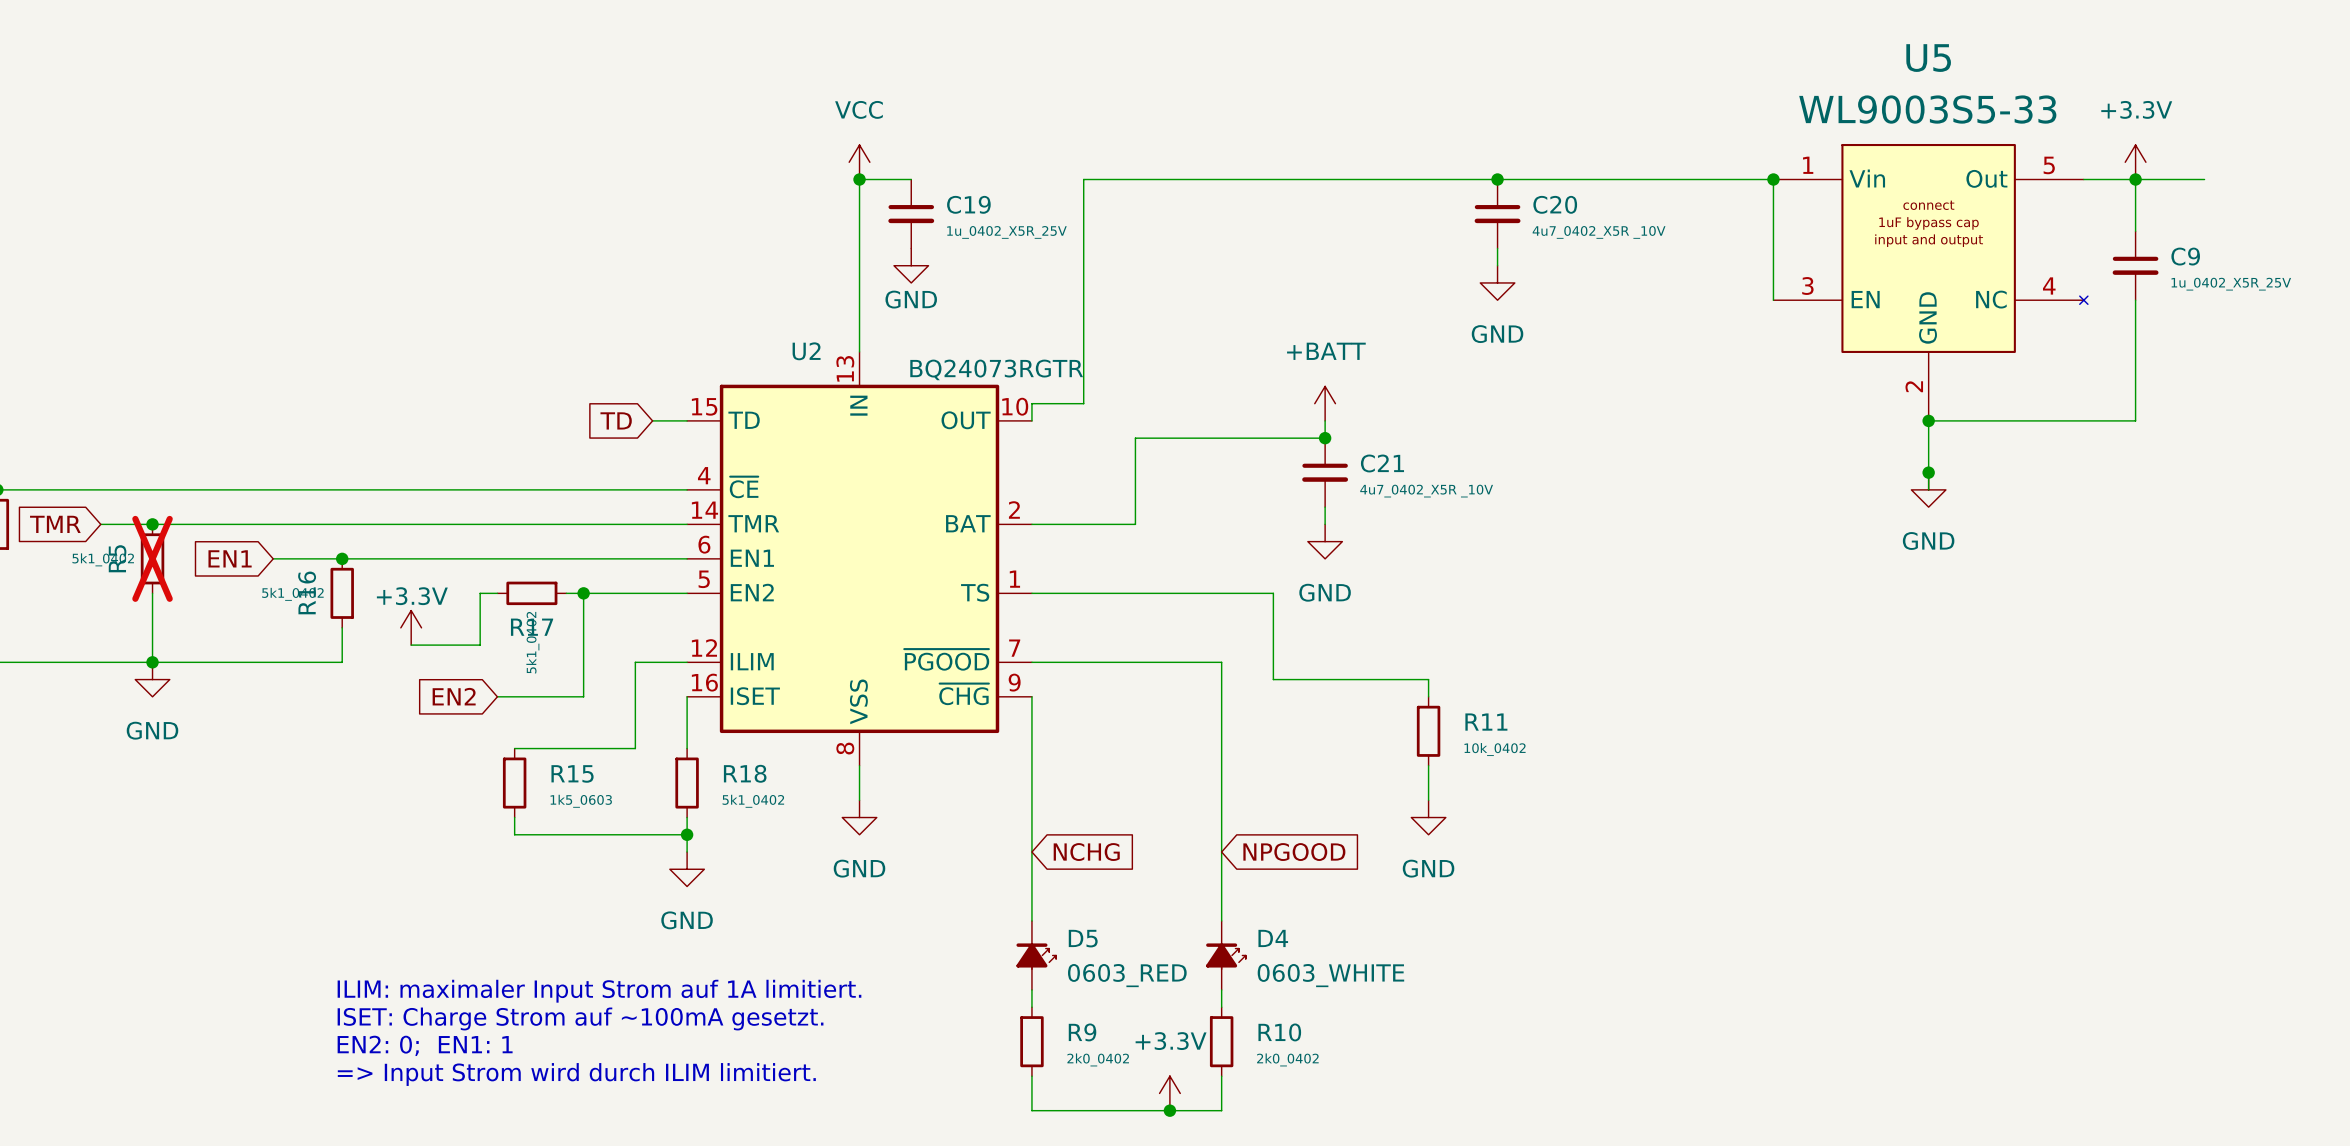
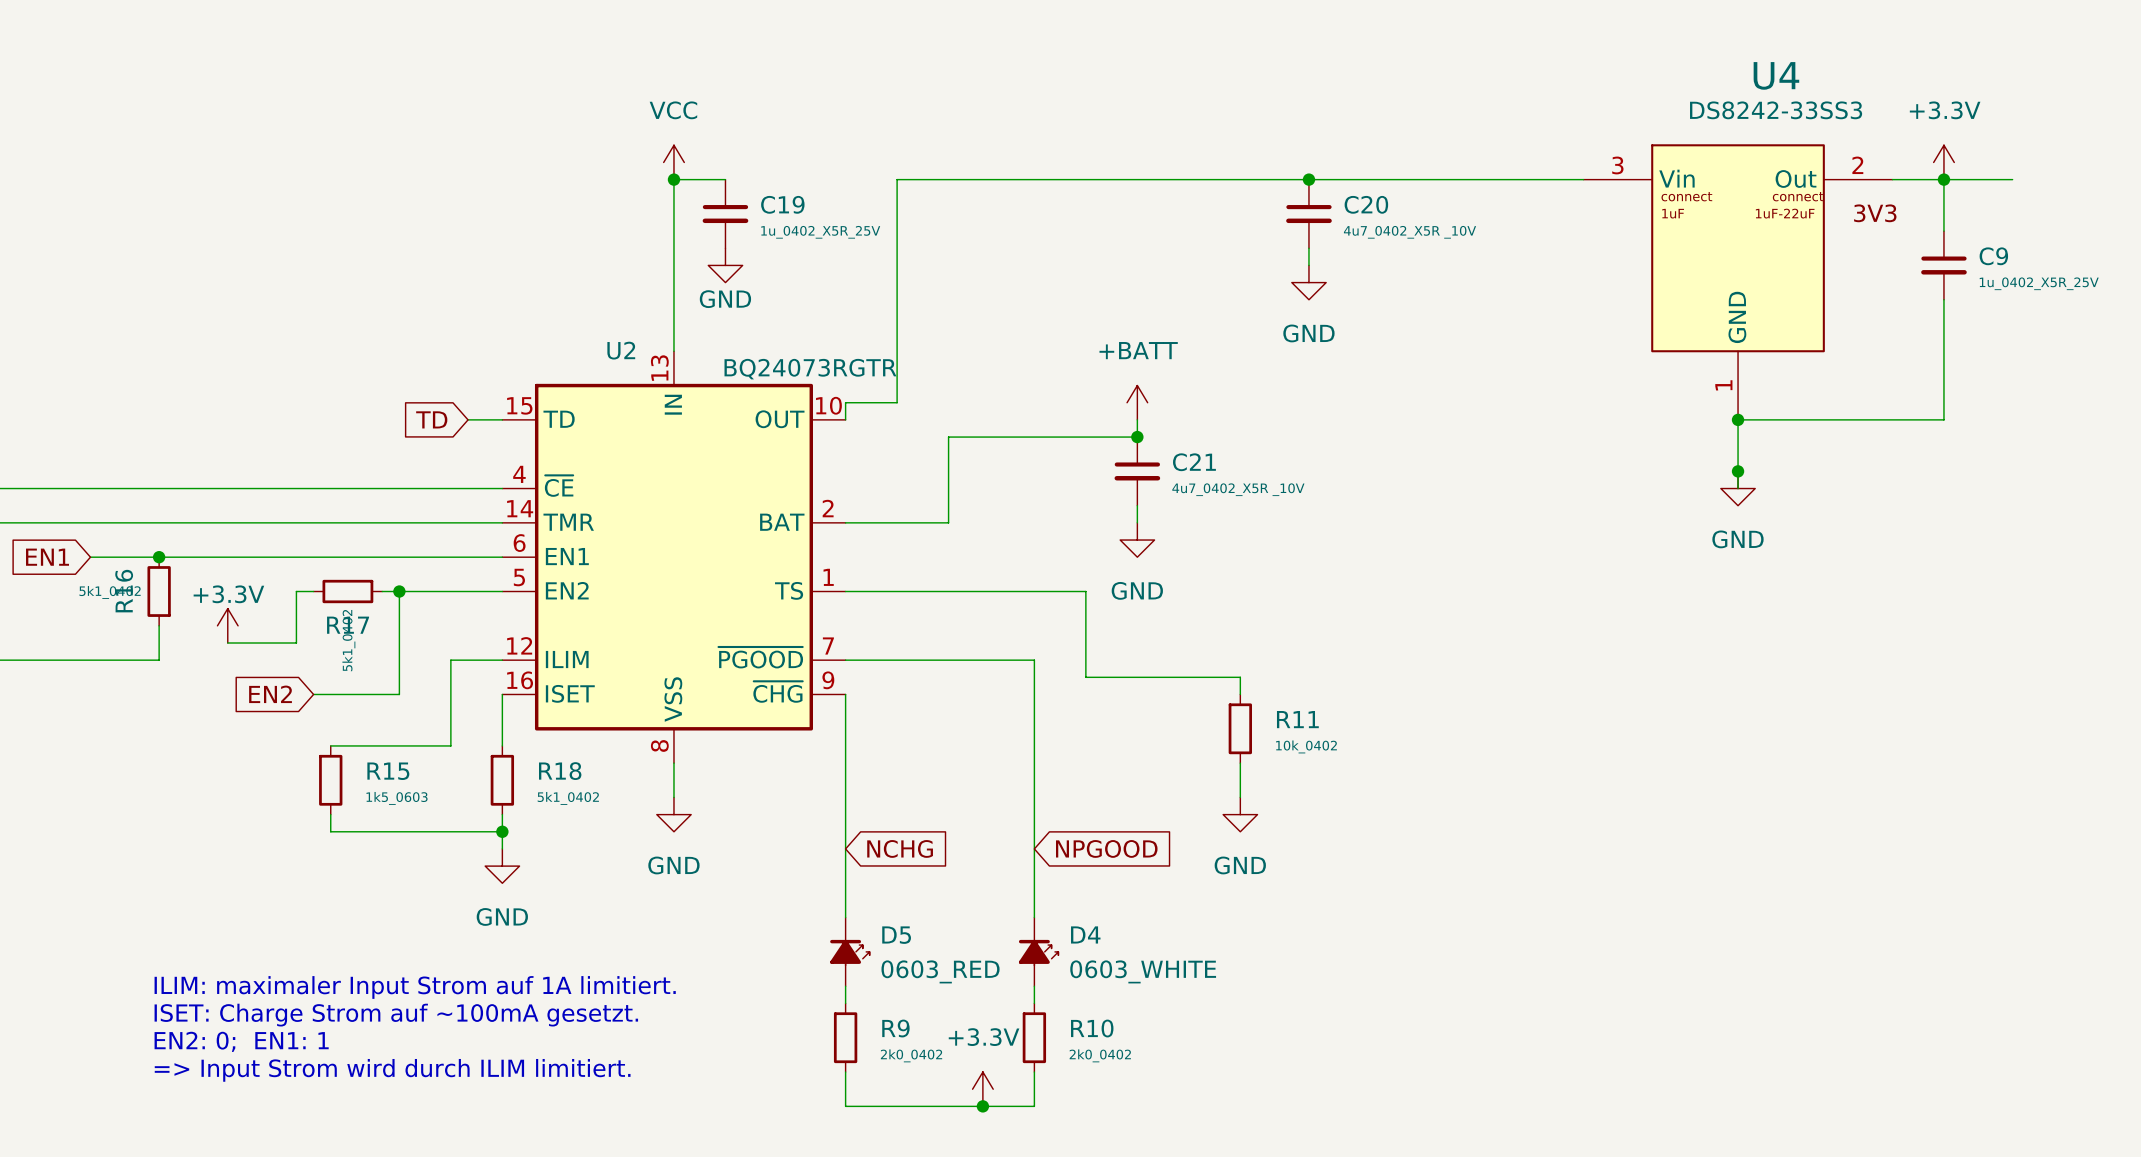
wire: (1773, 179) (1773, 300) -> none
junction: (1773, 179) -> none
U4: none -> DS8242-33SS3 (1738, 282)
U5: WL9003S5-33 (1930, 282) -> none

